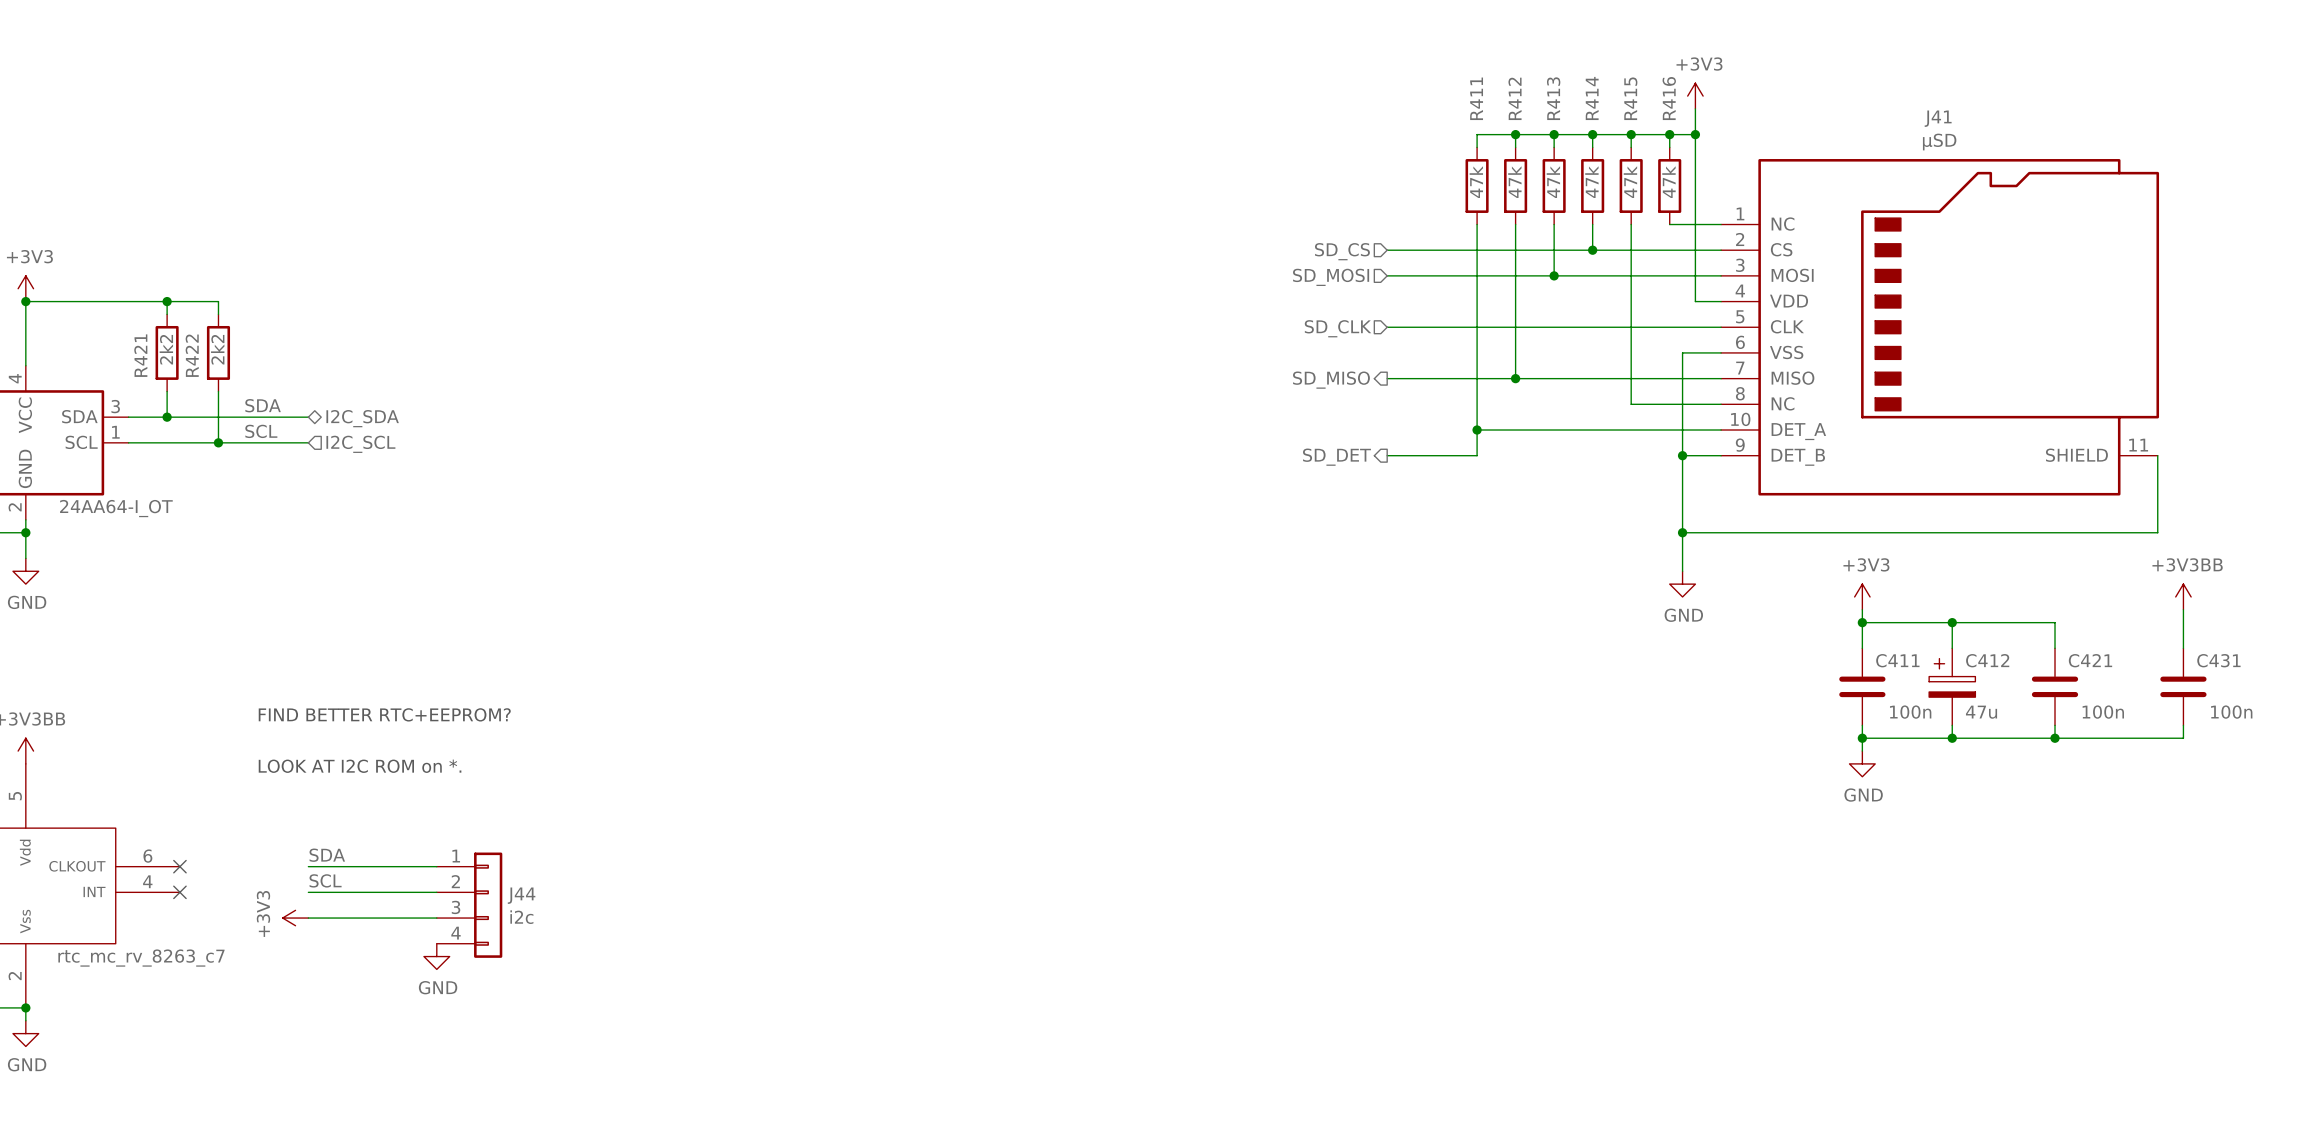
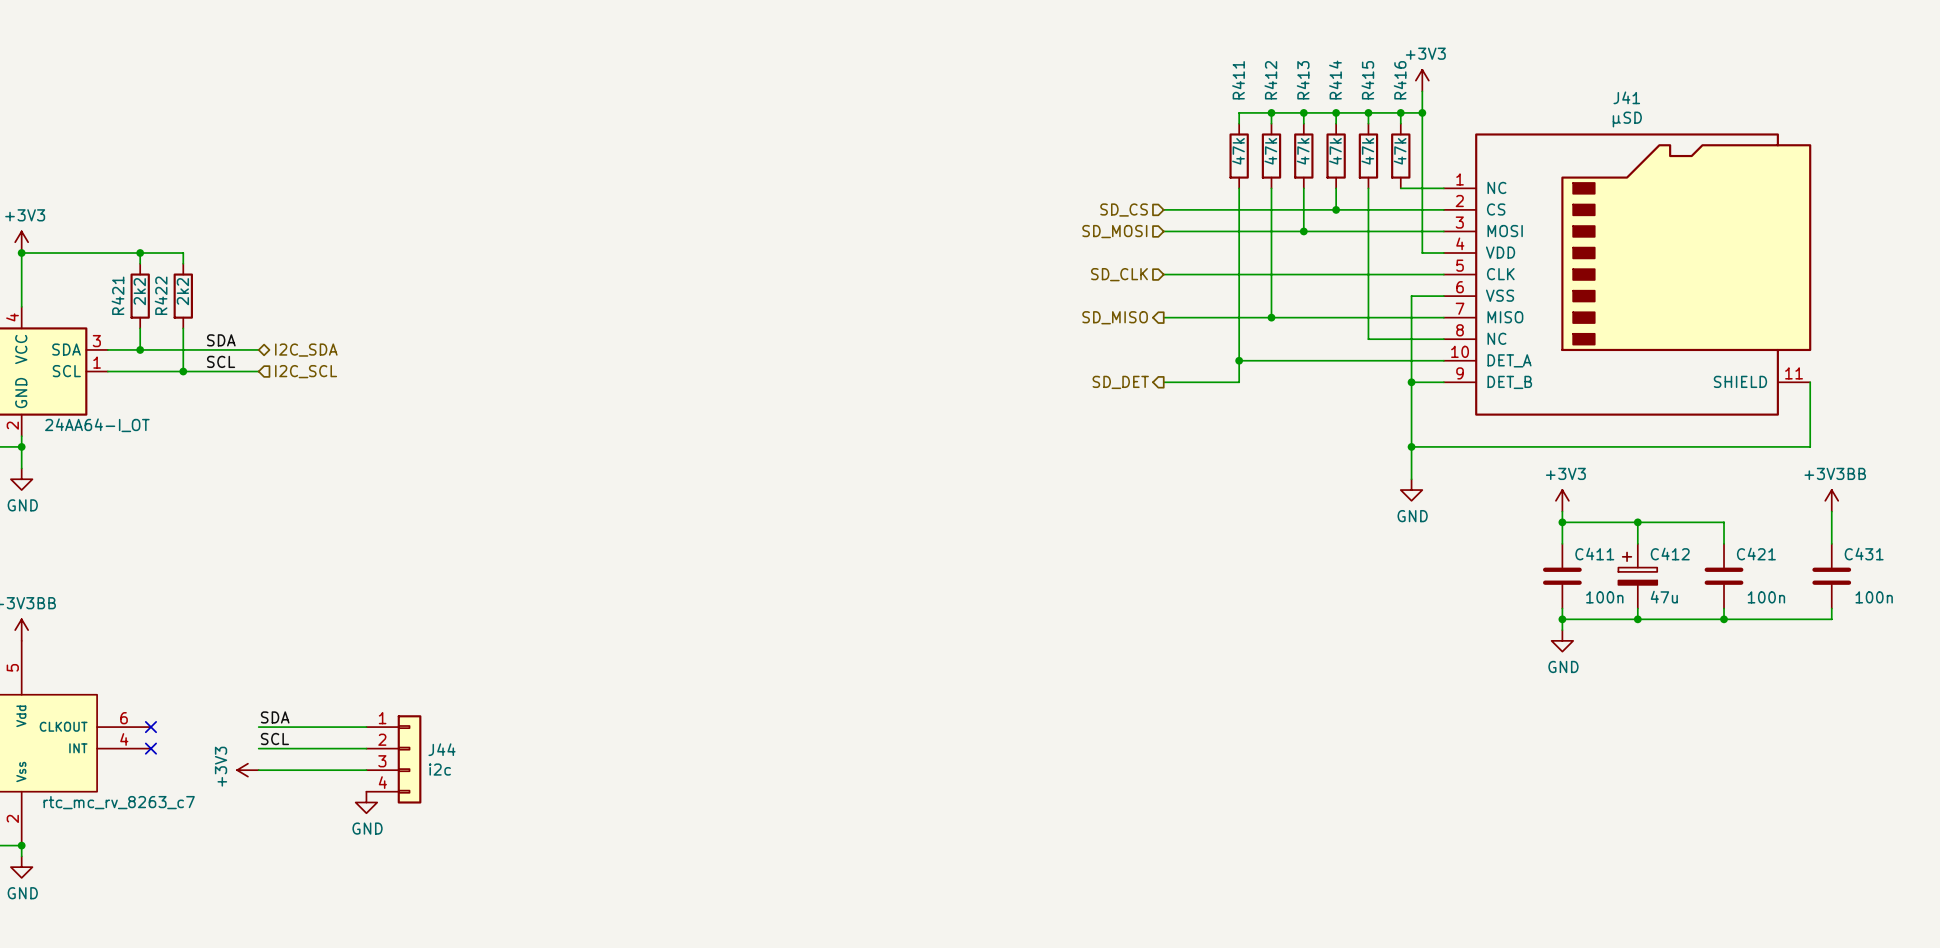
text: FIND BETTER RTC+EEPROM? (384, 714) -> none
text: LOOK AT I2C ROM on *. (360, 766) -> none

